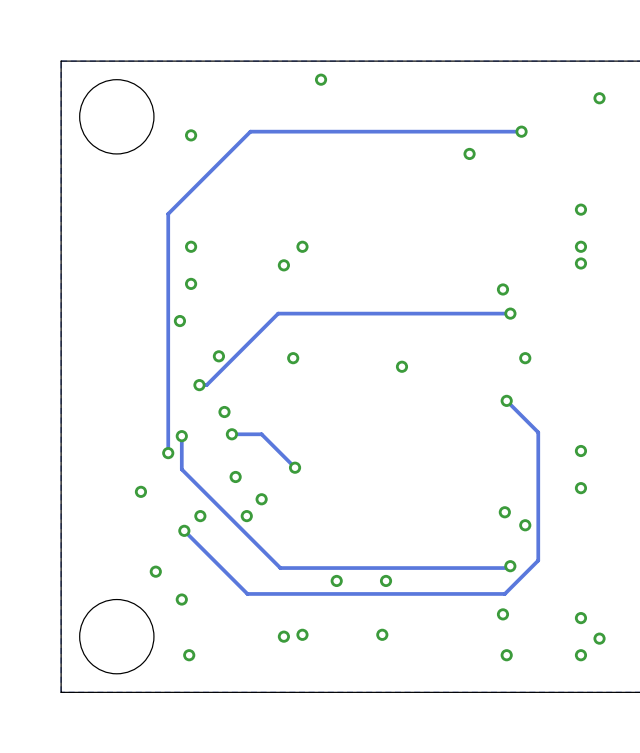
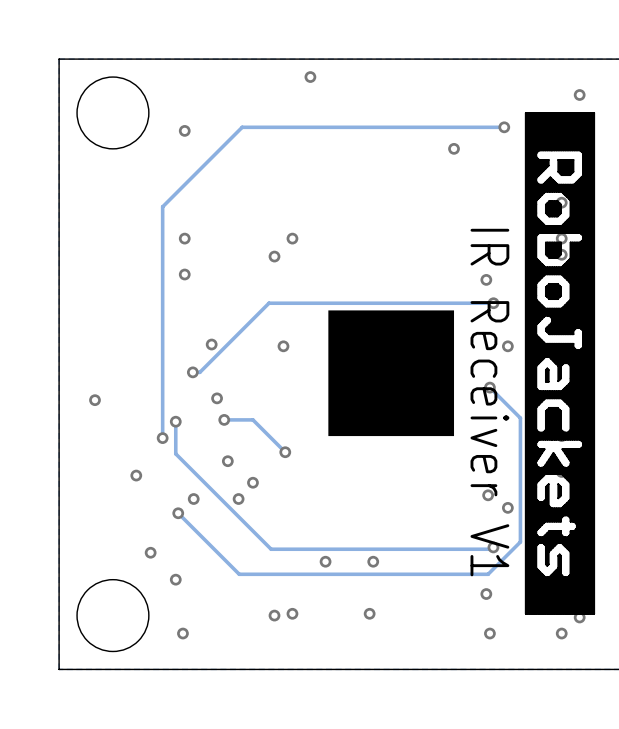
drawing: none -> [524, 112, 596, 615]
via: (179, 321) -> none
drawing: none -> [328, 310, 455, 437]
via: none -> (94, 400)
text: none -> IR Receiver V1 (489, 402)

